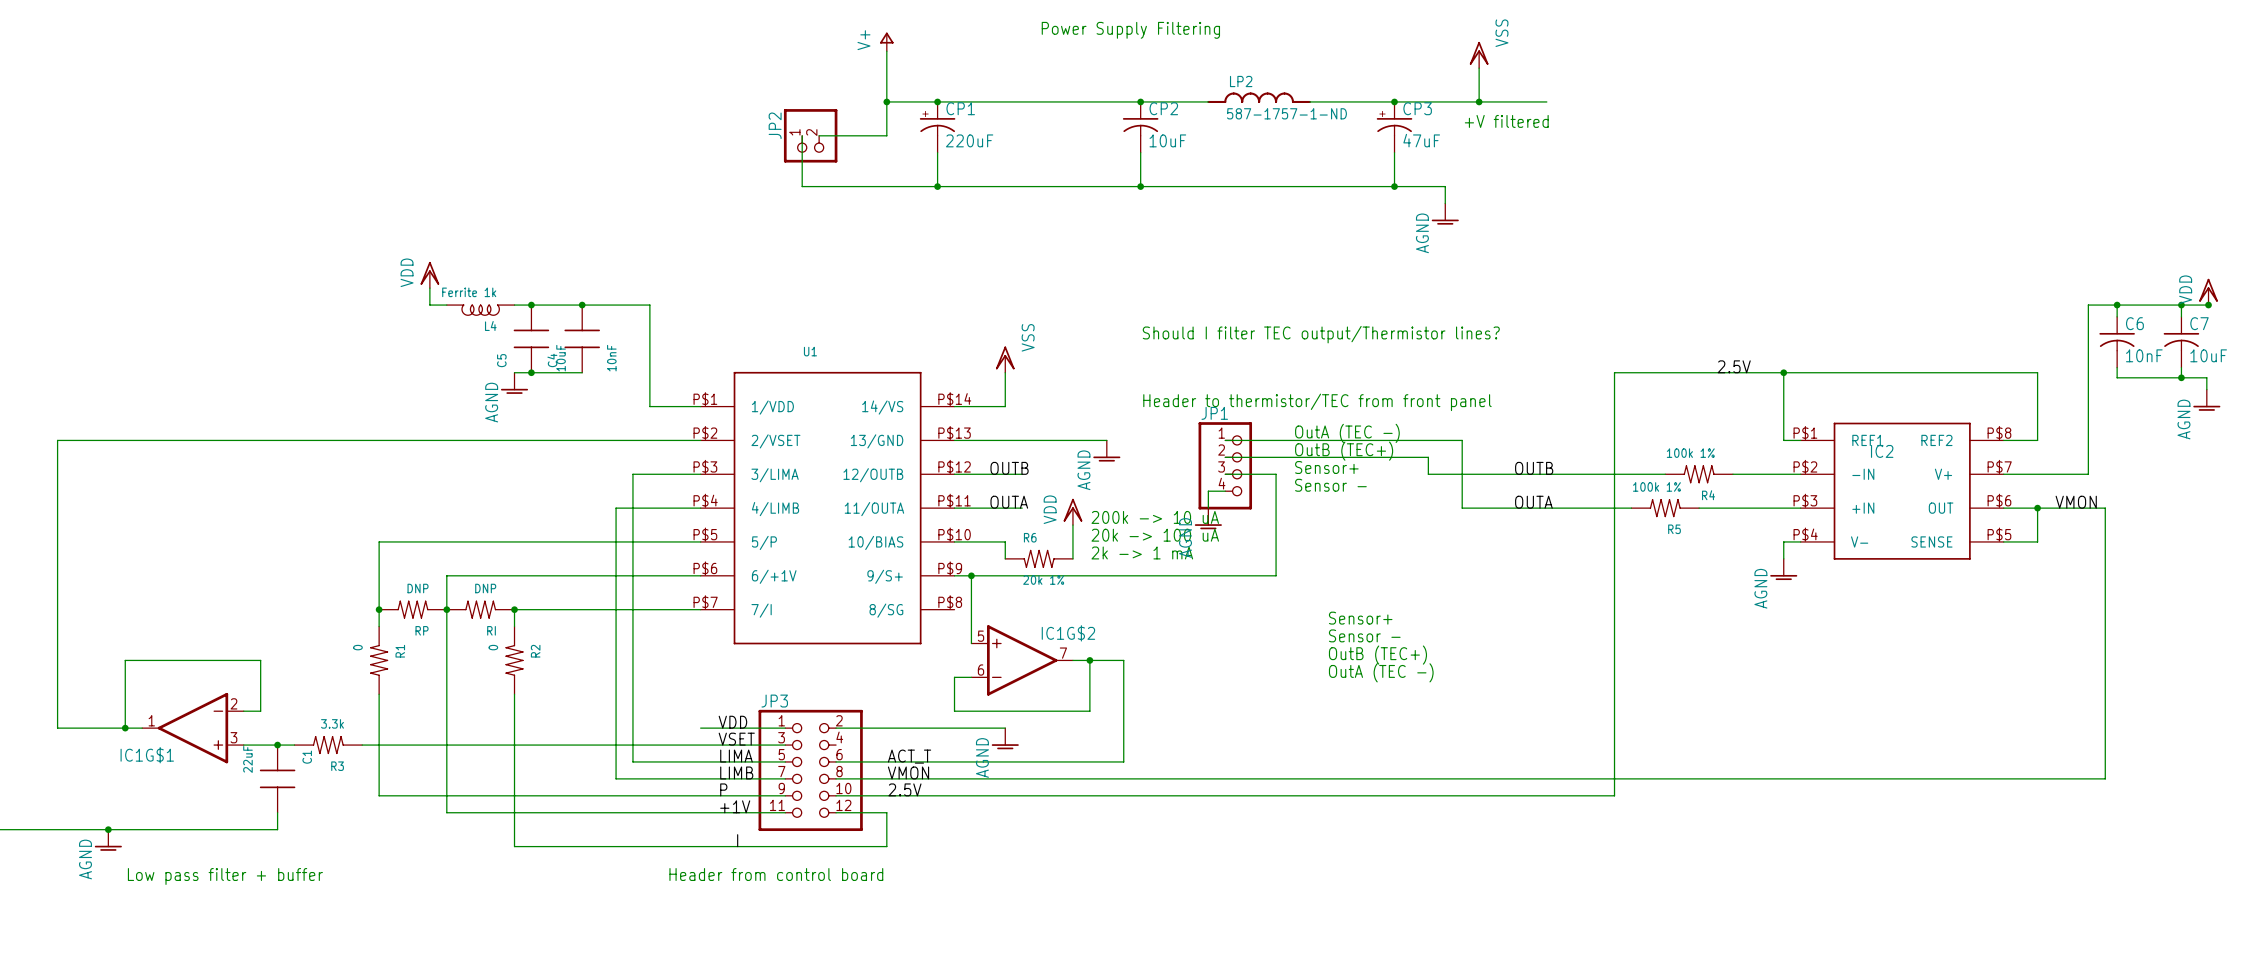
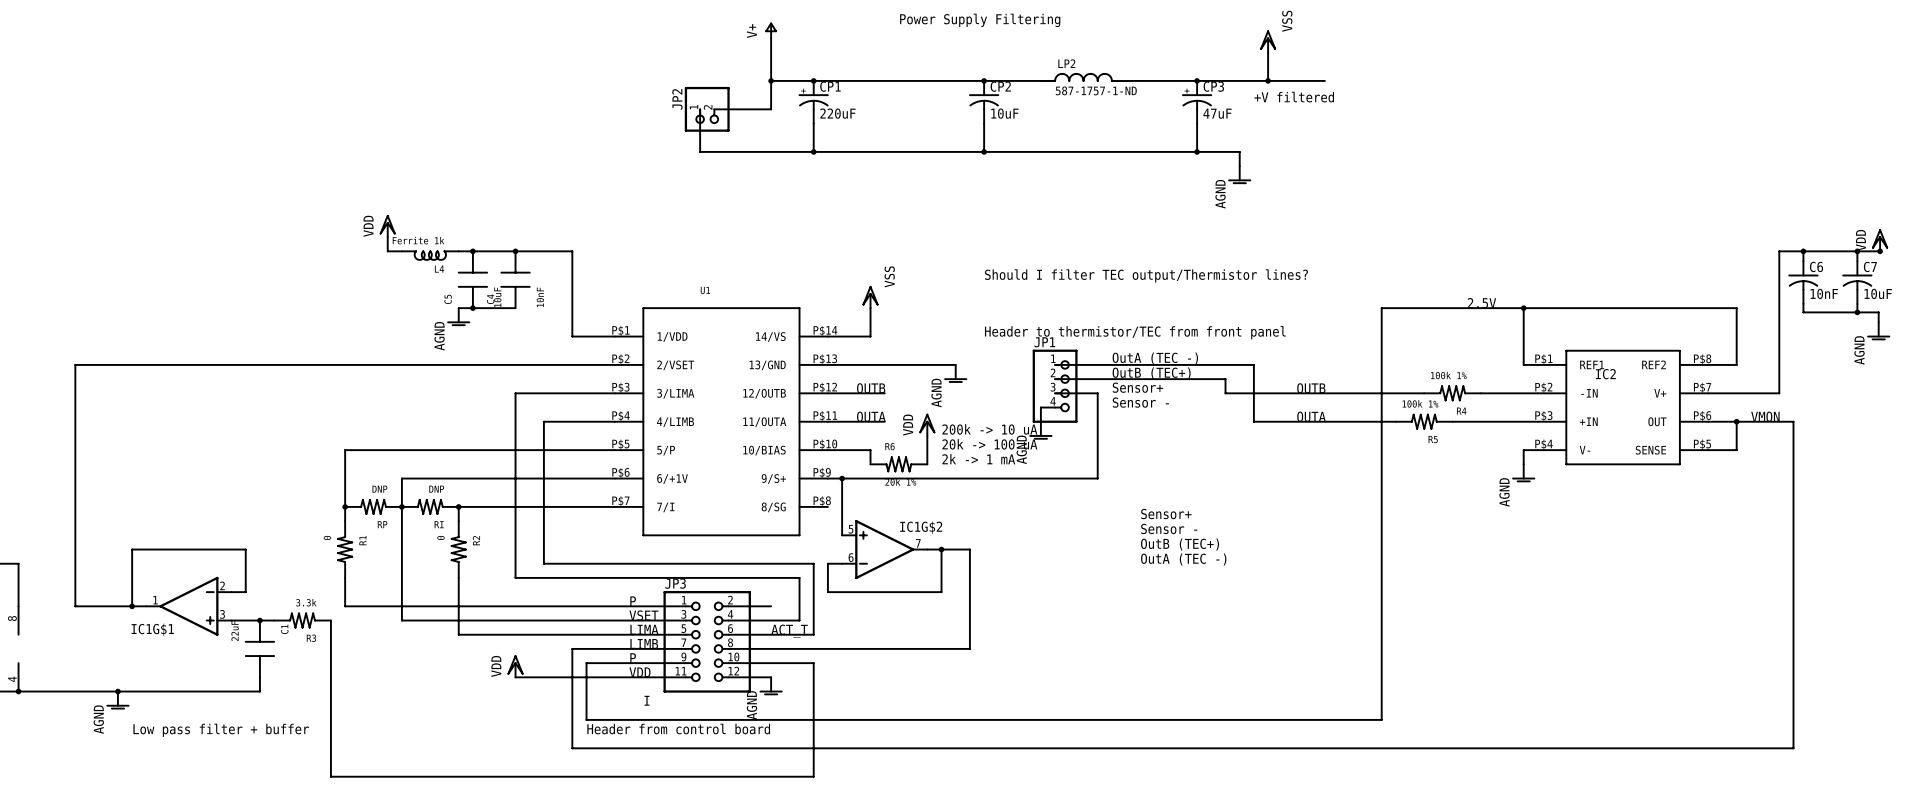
wire: (632, 474) (632, 761) -> (558, 393) (515, 393) (515, 577) (799, 577) (799, 620) (728, 620)
wire: (616, 677) (616, 778) (649, 778) -> (543, 563) (813, 563) (813, 634)
label: VDD (732, 722) -> P (633, 601)
wire: (379, 728) (379, 795) (666, 795) -> (345, 606) (614, 606)
wire: (886, 728) (1005, 728) -> none
power symbol position: AGND (1005, 738) -> AGND (771, 686)
wire: (362, 745) (446, 745) (446, 812) (582, 812) -> (330, 620) (330, 776) (813, 776) (813, 663)
wire: (514, 761) (514, 846) (886, 846) (886, 812) -> (458, 634) (558, 634)
wire: (937, 761) (1123, 761) -> (969, 648) (969, 634)
label: VMON (908, 772) -> none
wire: (1123, 778) (2105, 778) -> (572, 648) (572, 748) (1793, 748) (1793, 648)
label: 2.5V (904, 789) -> none
wire: (937, 795) (1614, 795) -> (586, 663) (586, 719) (1381, 719) (1381, 663)
power symbol: none -> VDD (515, 666)
label: +1V (735, 806) -> VDD (640, 672)

